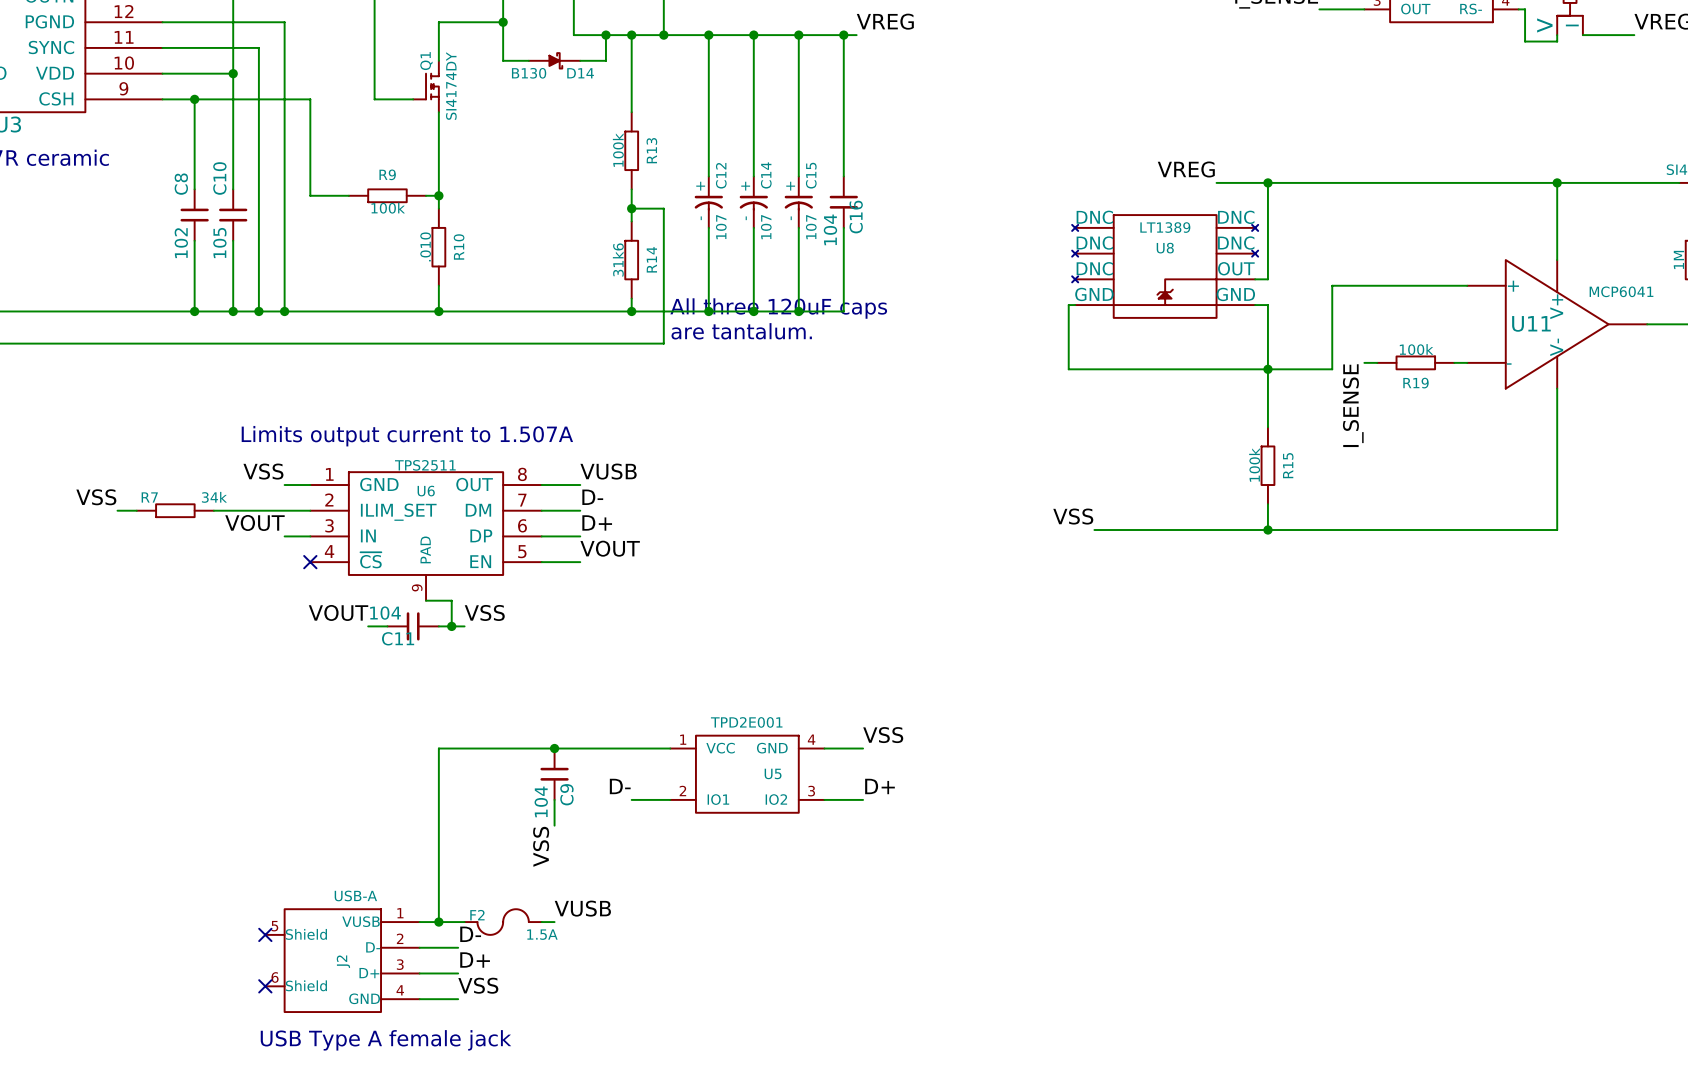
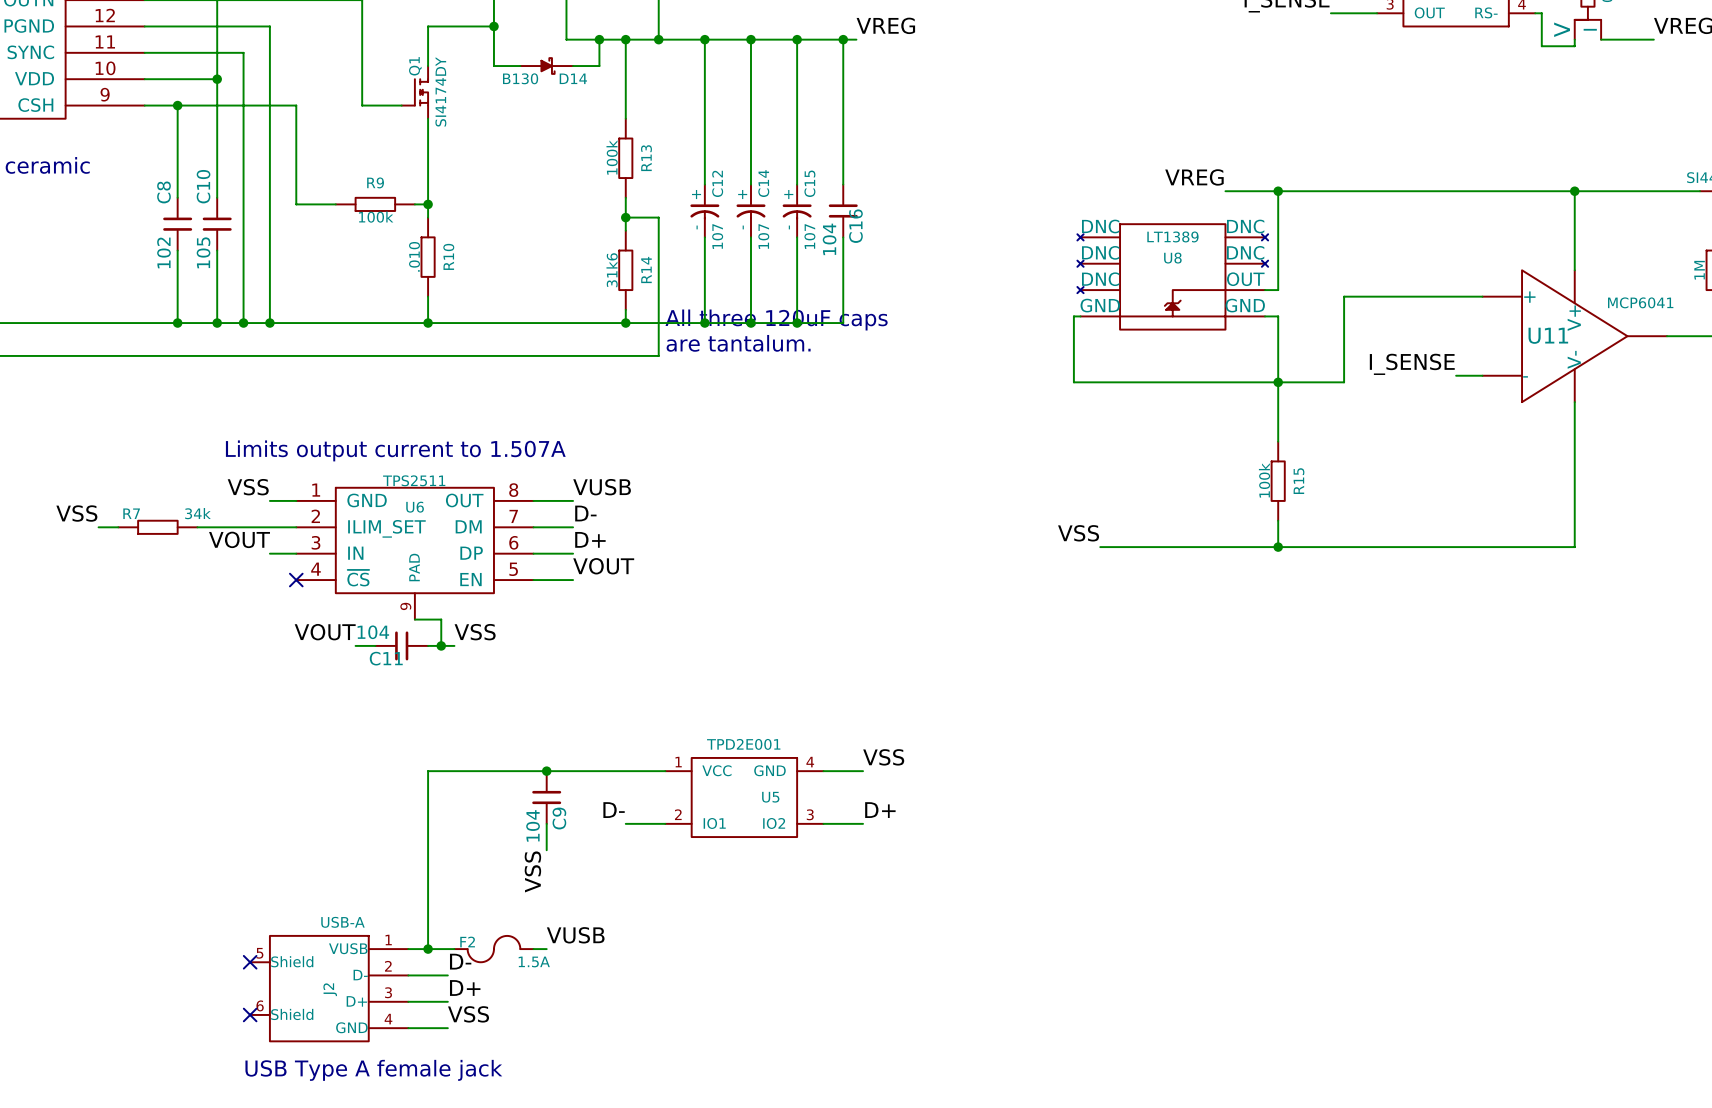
R19: 100k (1415, 362) -> none
label rotation: 0° (1353, 405) -> 90° clockwise (1412, 364)

